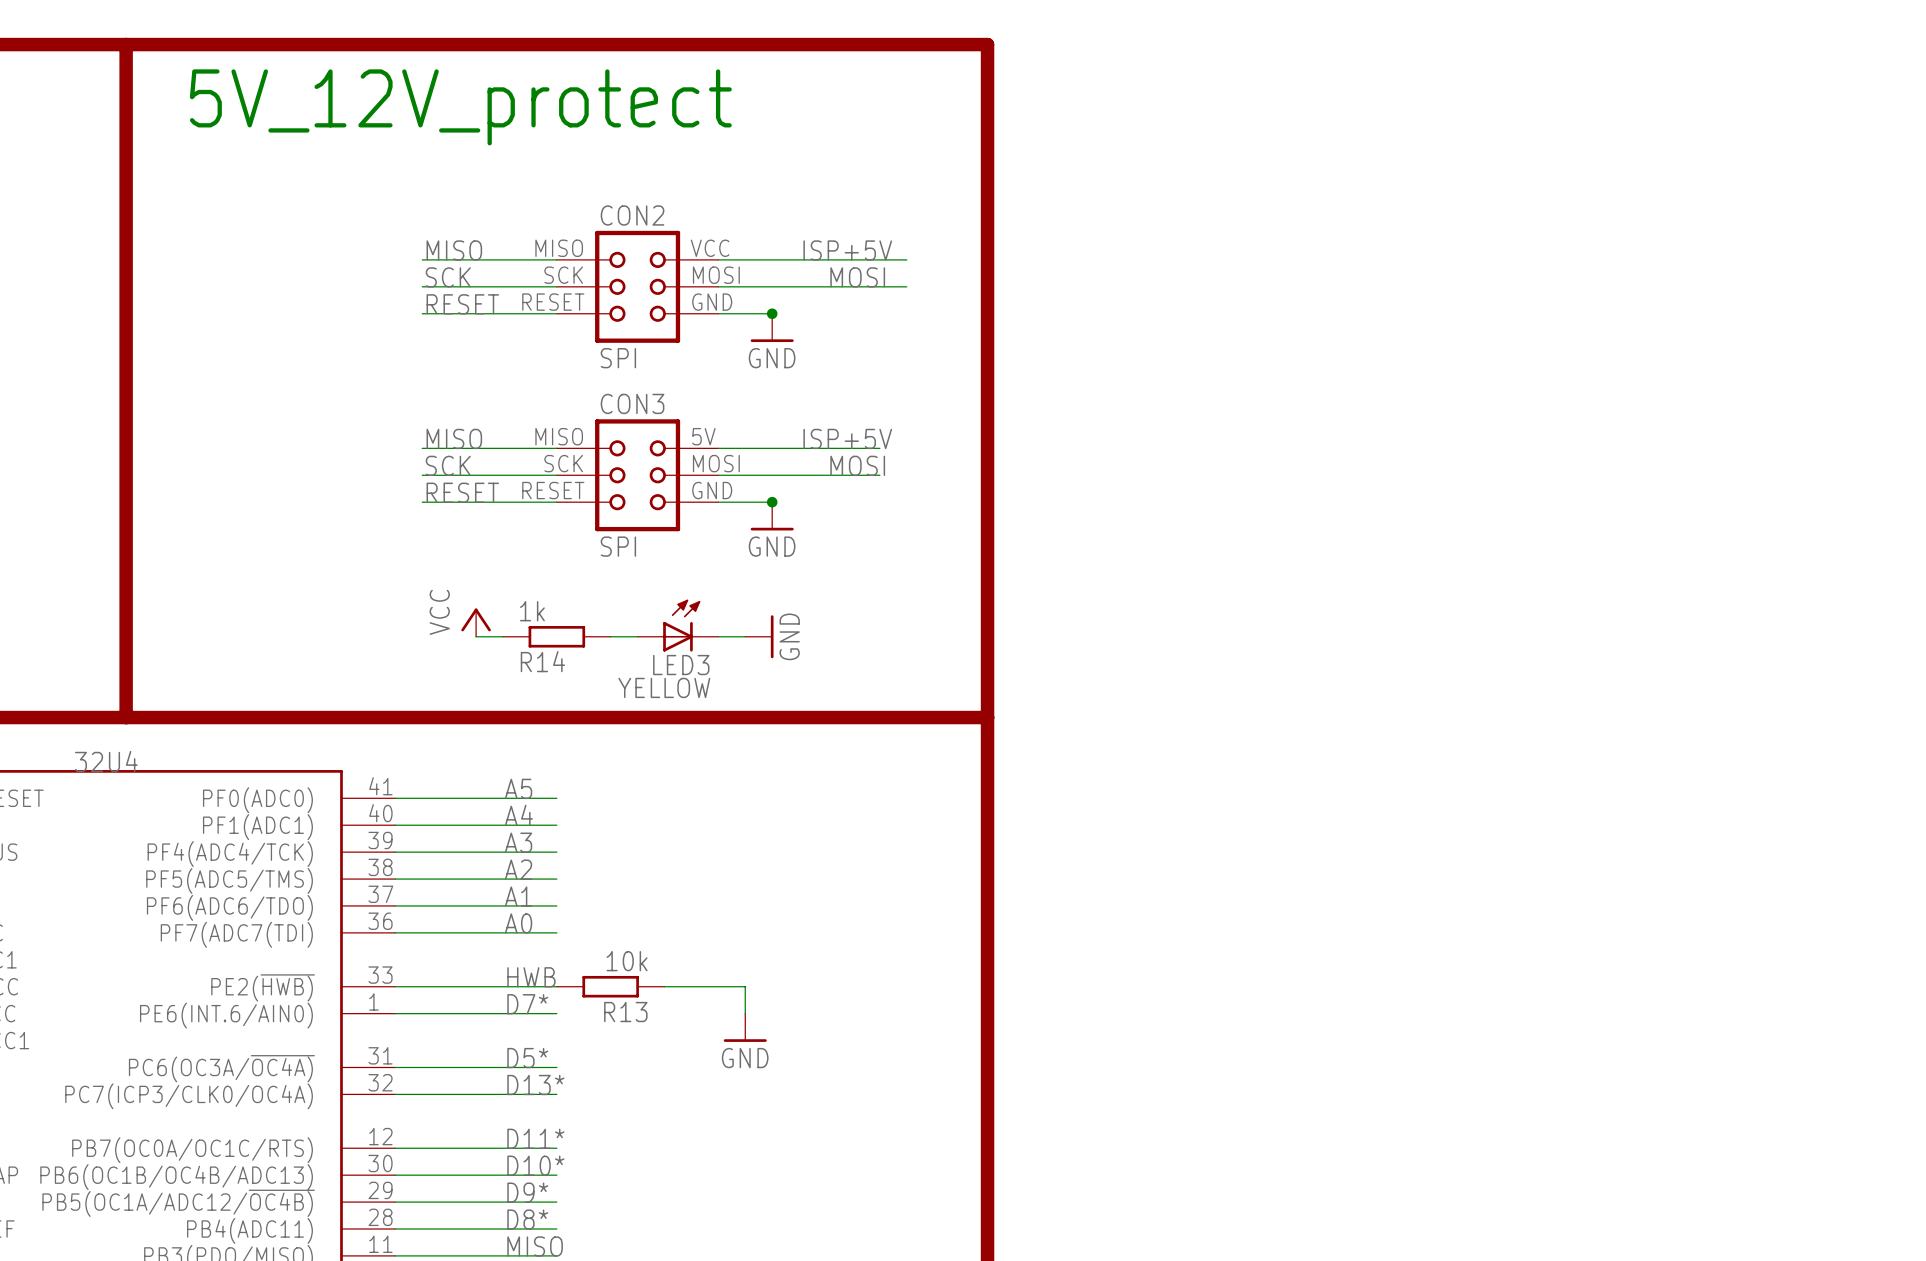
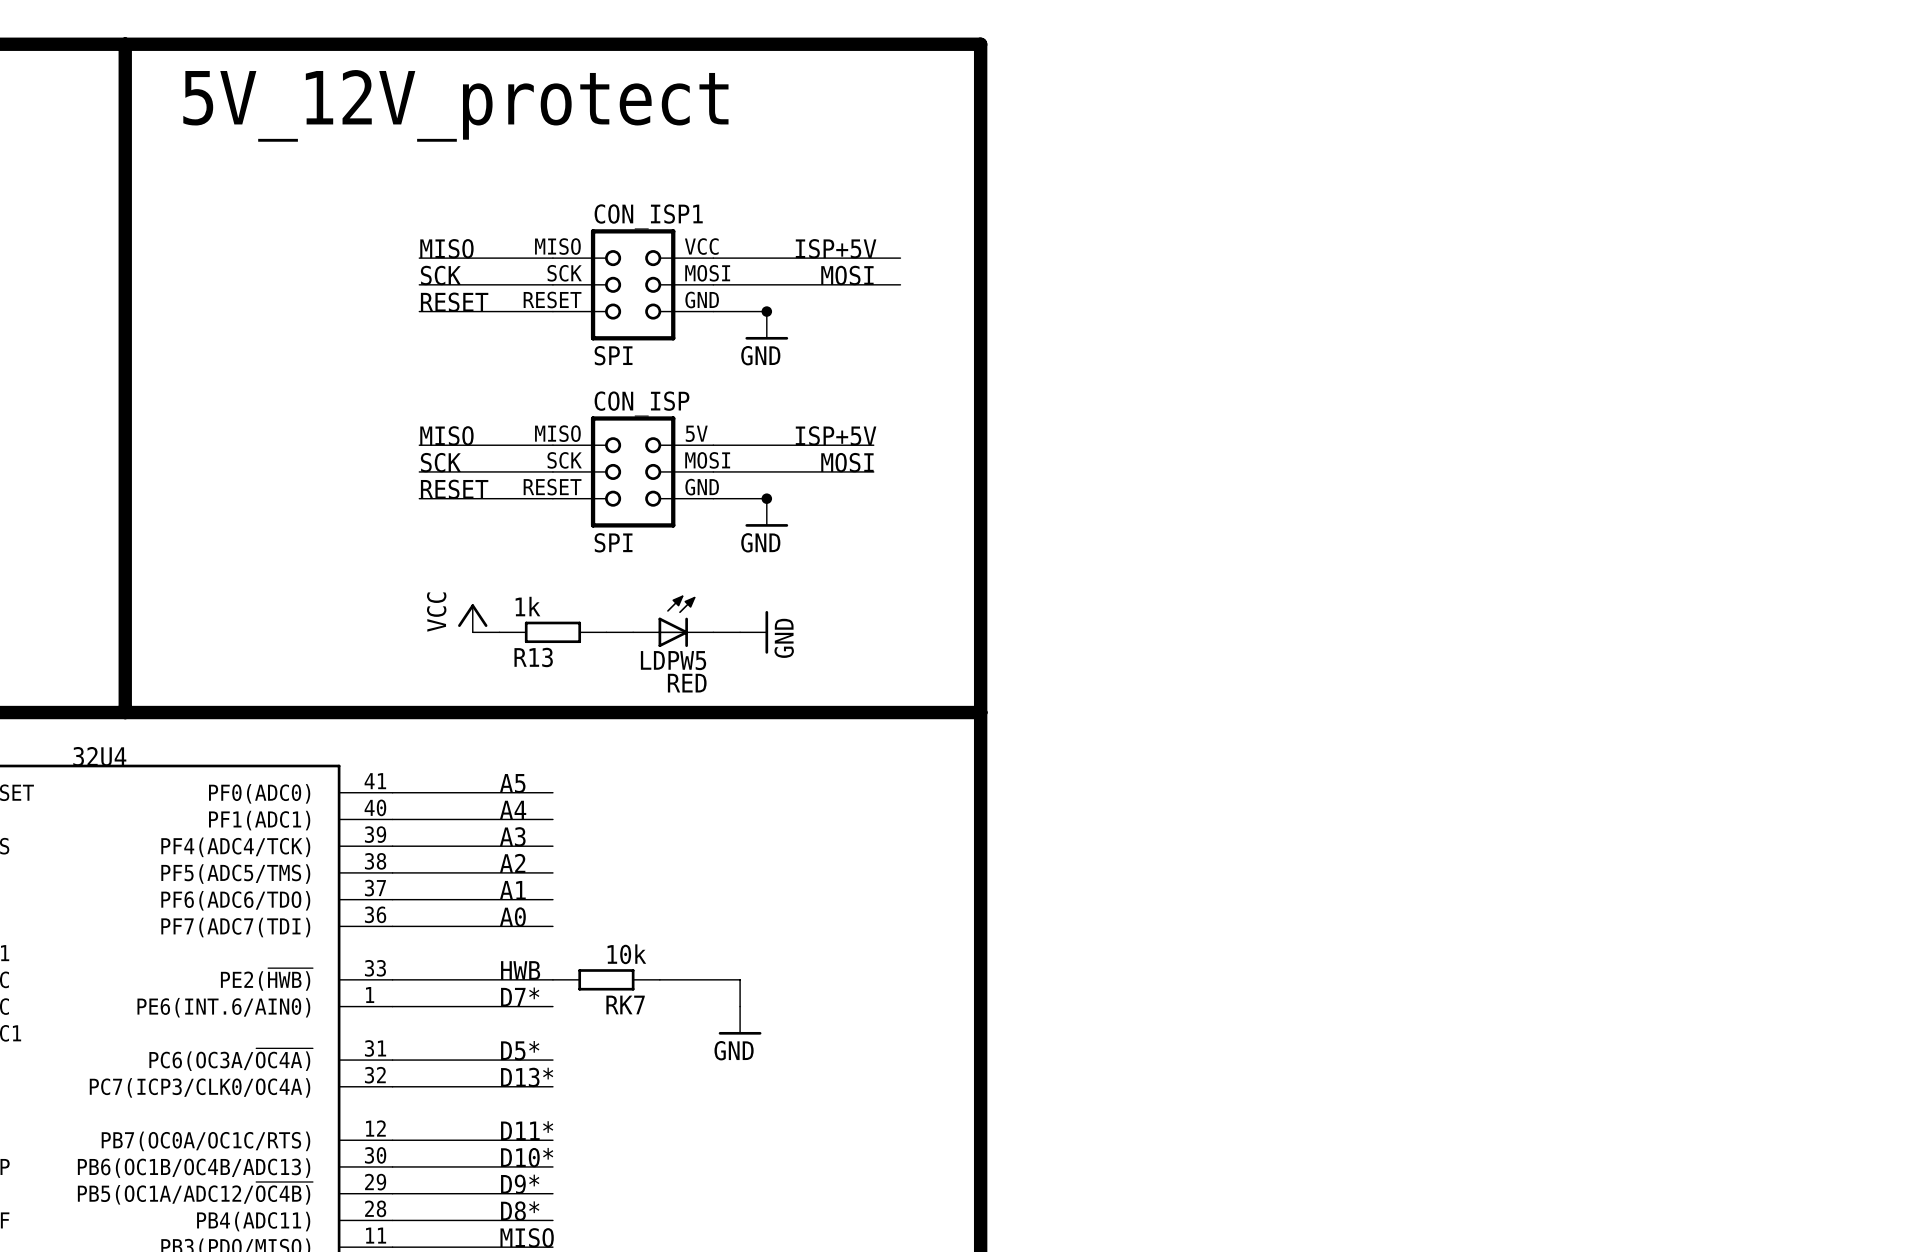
CON2 name: CON2 (632, 215) -> CON_ISP1 (648, 216)
CON3 name: CON3 (632, 403) -> CON_ISP (641, 403)
R14 name: R14 (542, 661) -> R13 (533, 657)
LED3 name: LED3 (681, 665) -> LDPW5 (673, 660)
LED3 value: YELLOW (664, 687) -> RED (687, 683)
R13 name: R13 (625, 1012) -> RK7 (625, 1004)

